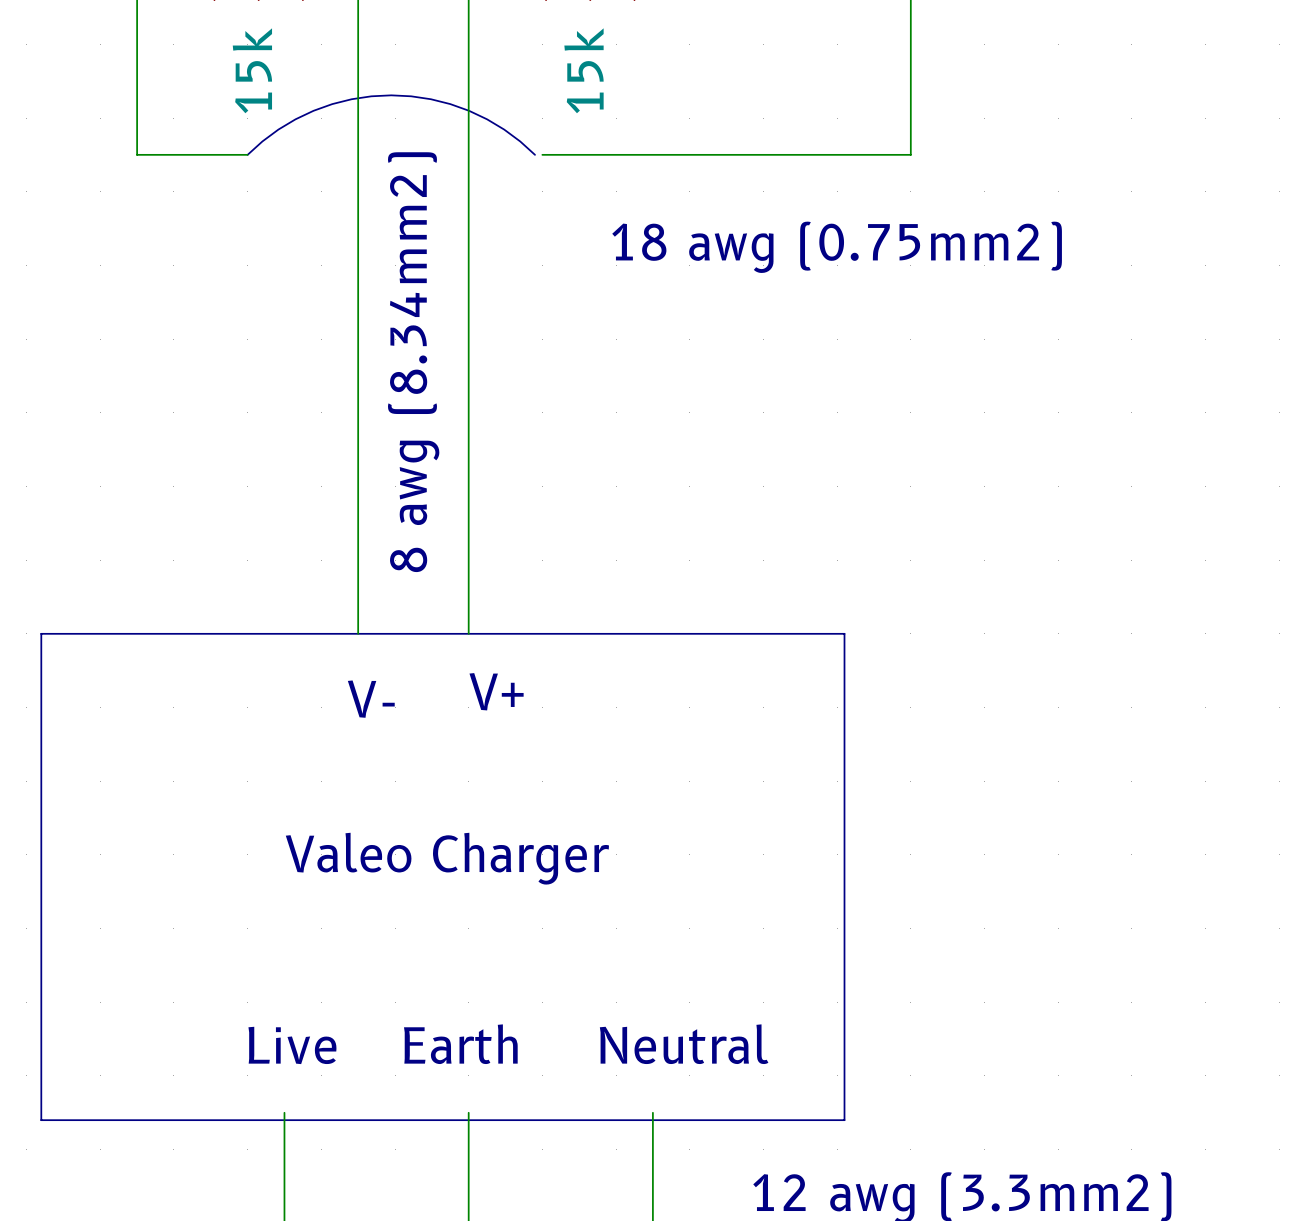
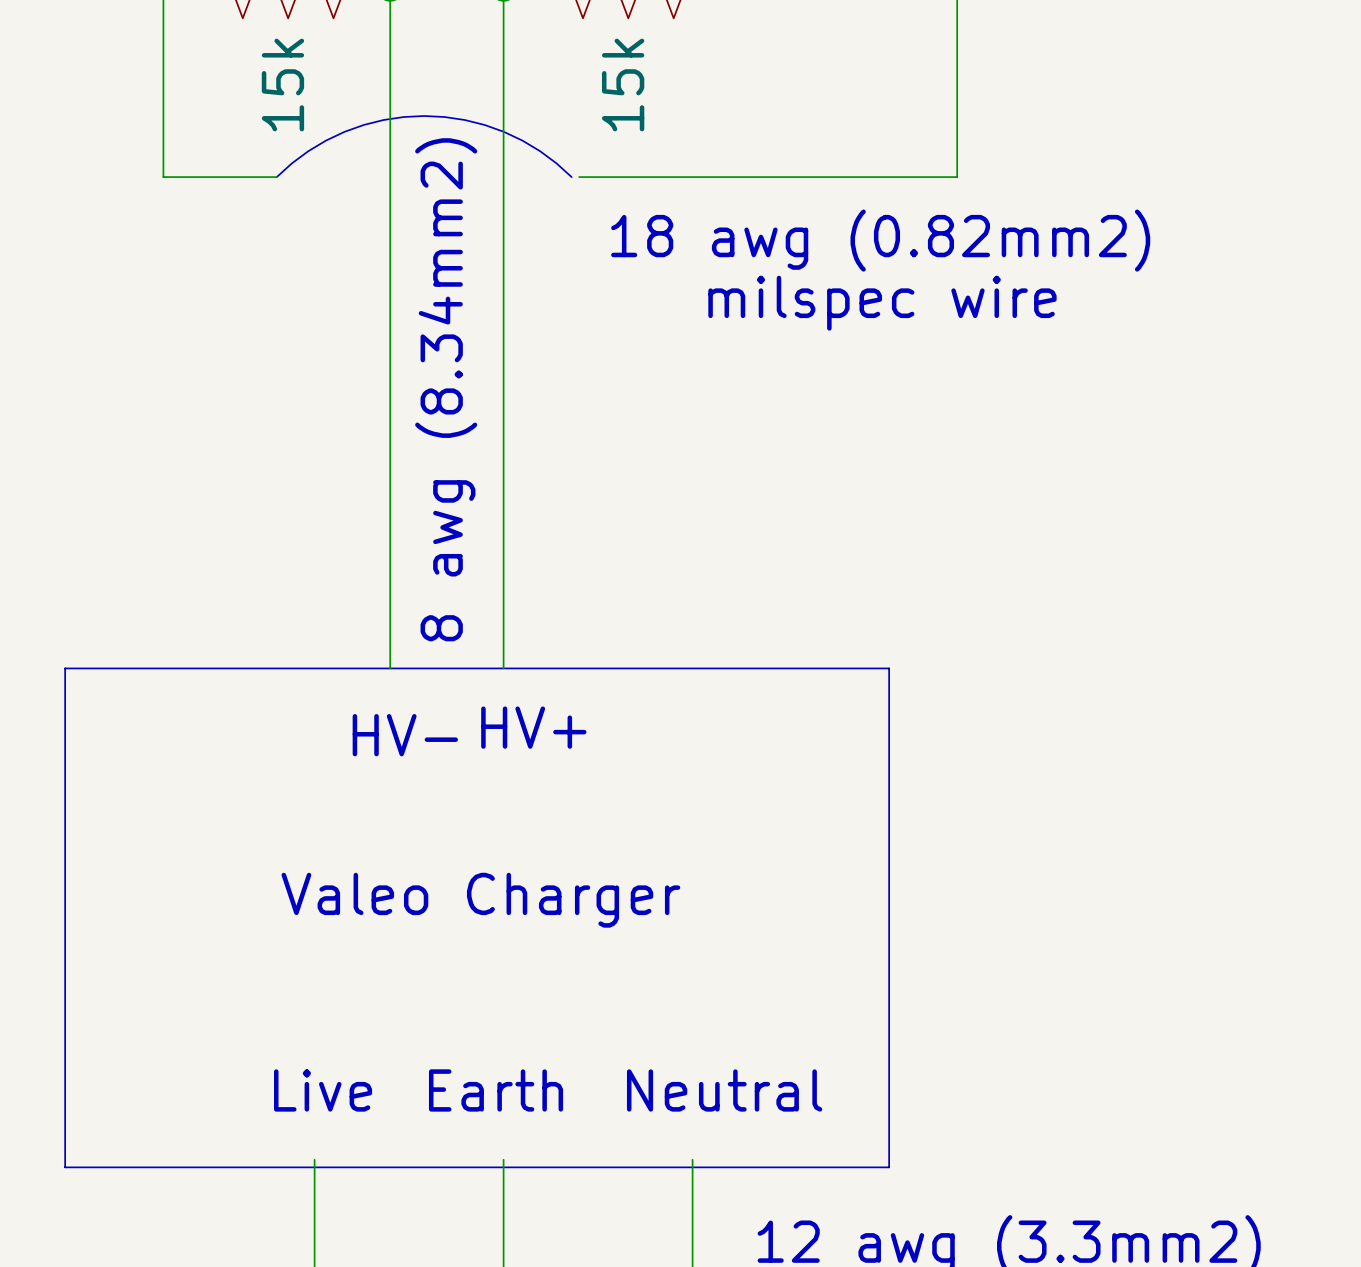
text: 18 awg (0.75mm2) (837, 247) -> 18 awg (0.82mm2) (880, 240)
text: none -> milspec wire (882, 303)
text: V+ (496, 691) -> HV+ (533, 727)
text: V- (371, 699) -> HV- (405, 735)

